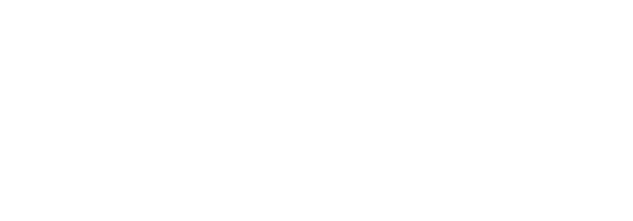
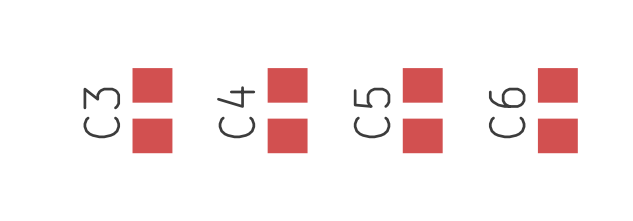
C3: none -> (152, 110)
C4: none -> (287, 110)
C5: none -> (422, 110)
C6: none -> (557, 110)

